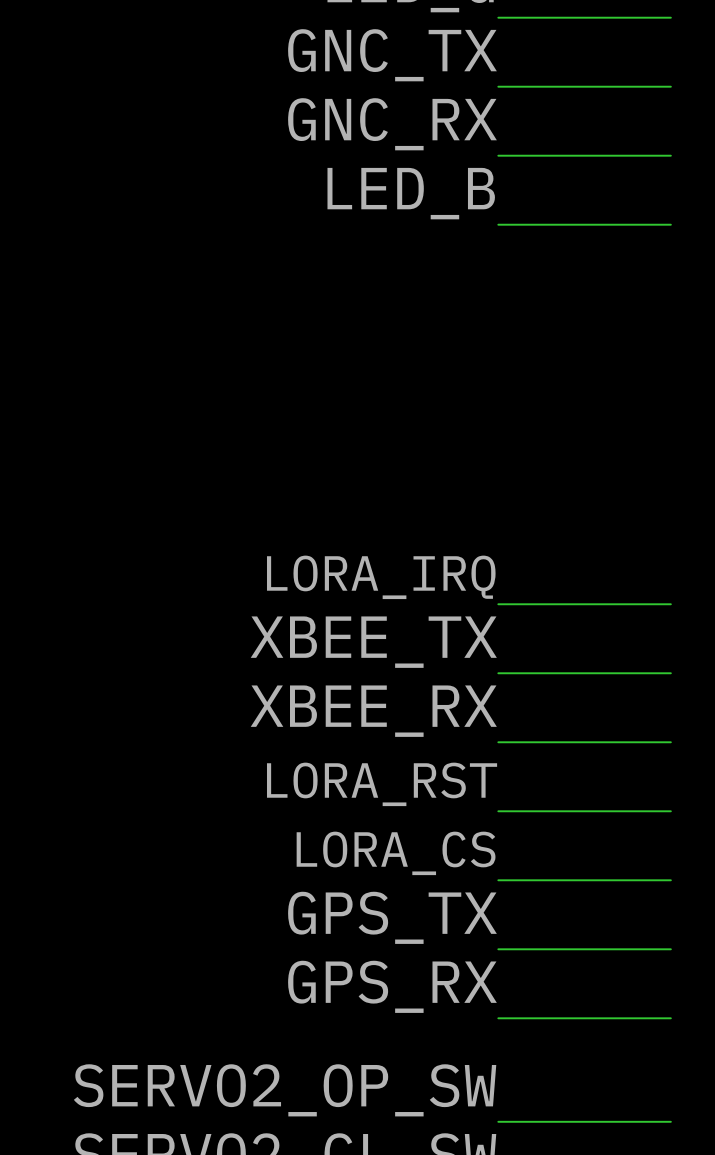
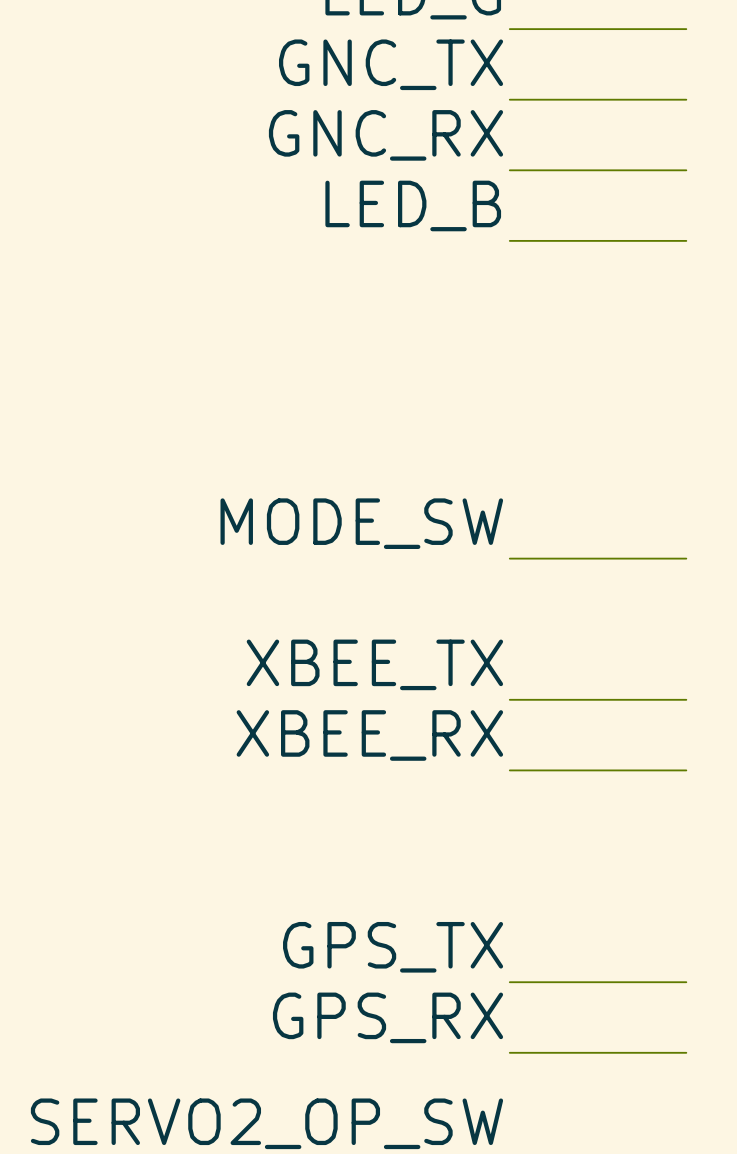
label: none -> MODE_SW (361, 523)
label: LORA_IRQ (381, 577) -> none
wire: (498, 604) (670, 604) -> (509, 558) (686, 558)
label: LORA_RST (382, 784) -> none
wire: (498, 811) (670, 811) -> none
label: LORA_CS (396, 853) -> none
wire: (498, 880) (670, 880) -> none

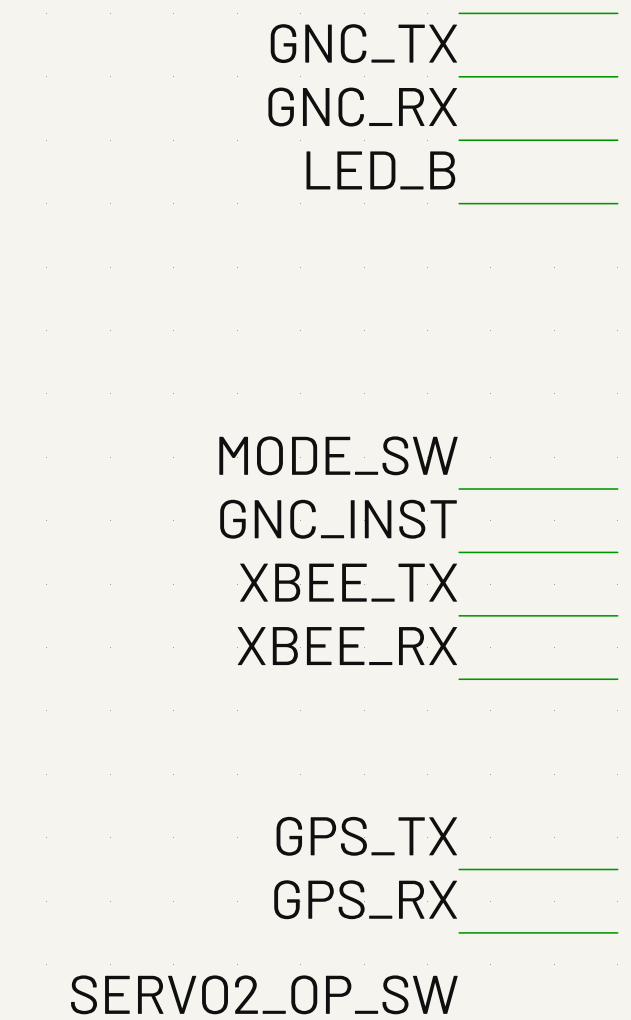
label: none -> GNC_INST (338, 519)
wire: none -> (459, 552) (617, 552)

